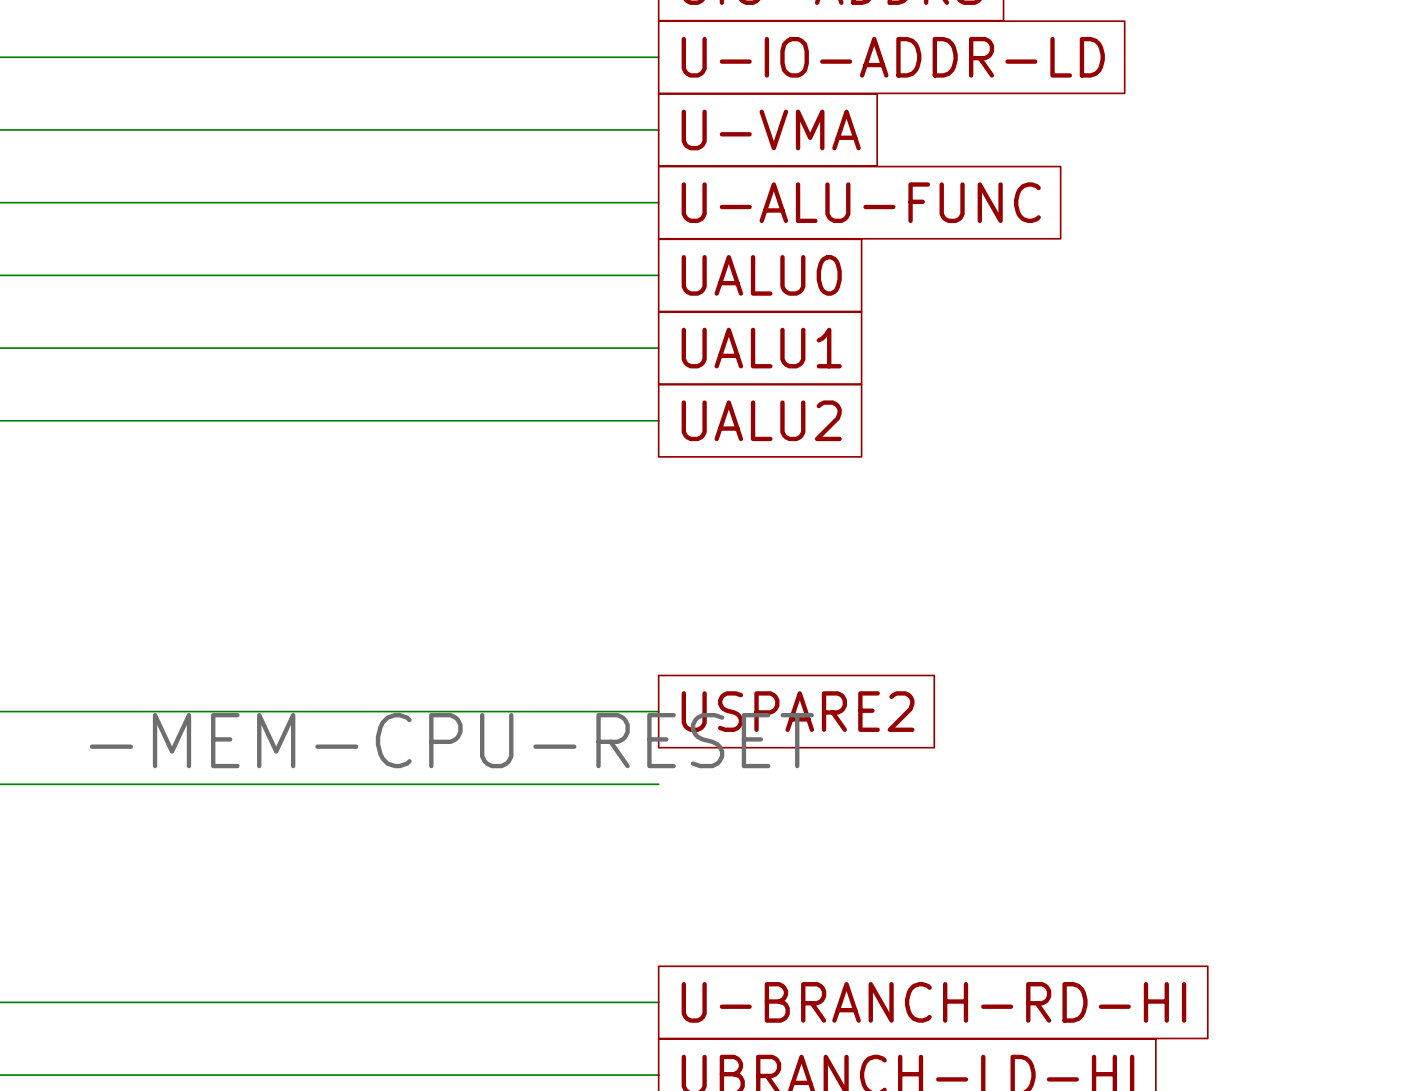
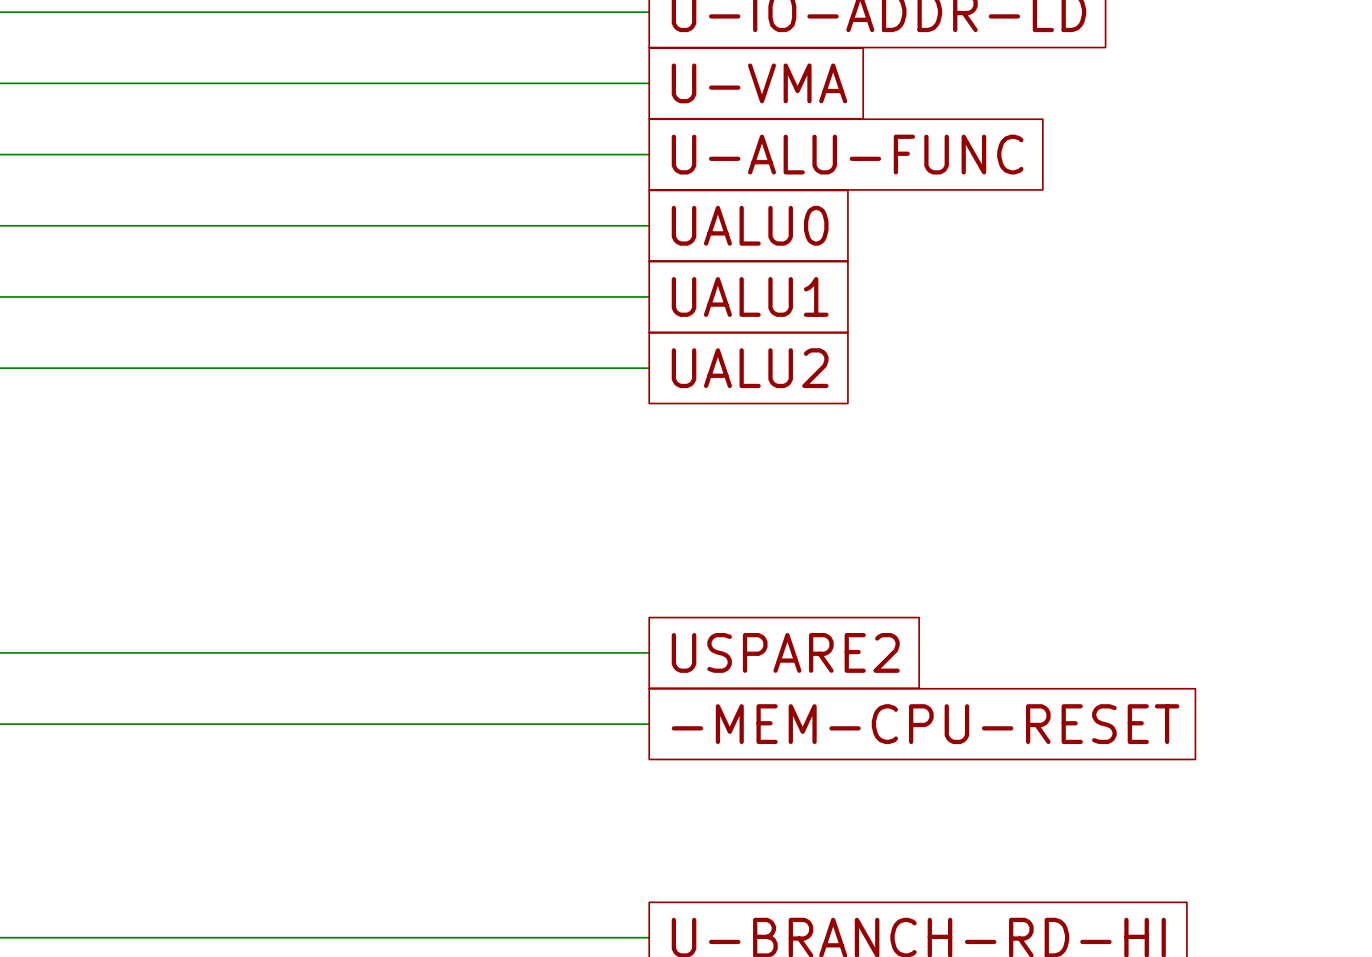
label: -MEM-CPU-RESET (451, 740) -> none
global label: none -> -MEM-CPU-RESET (925, 724)

